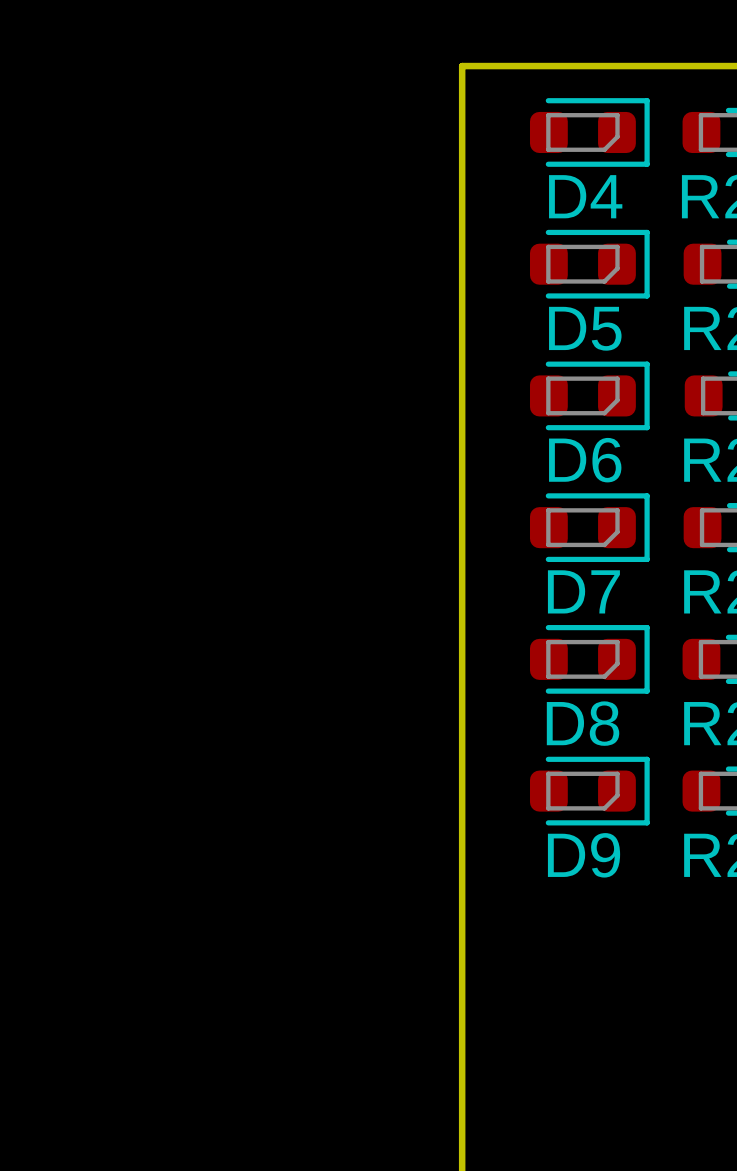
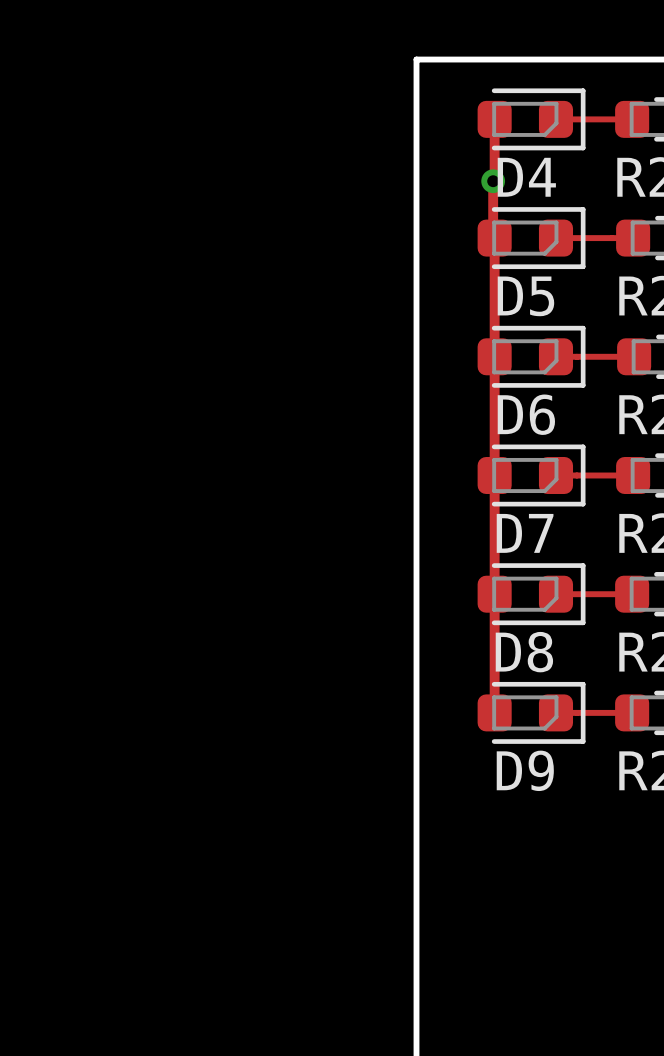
track: none -> (494, 119) (494, 712)
track: none -> (555, 119) (632, 119)
via: none -> (493, 181)
track: none -> (555, 238) (633, 238)
track: none -> (555, 356) (634, 356)
track: none -> (555, 475) (633, 475)
track: none -> (555, 594) (632, 594)
track: none -> (555, 712) (632, 712)

